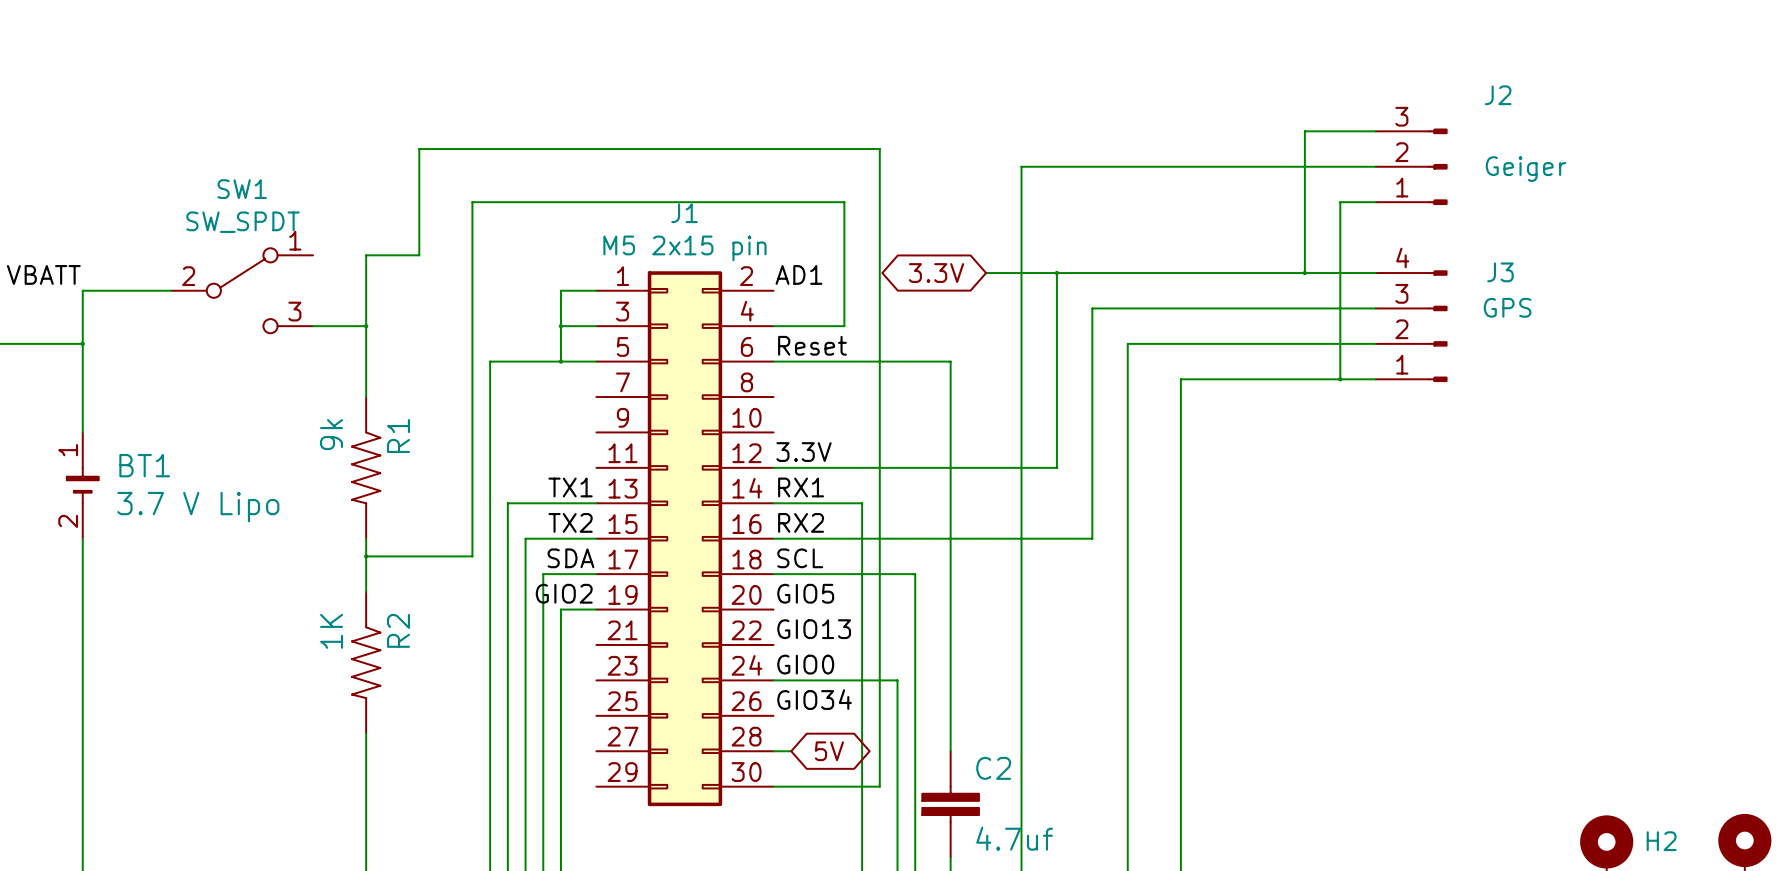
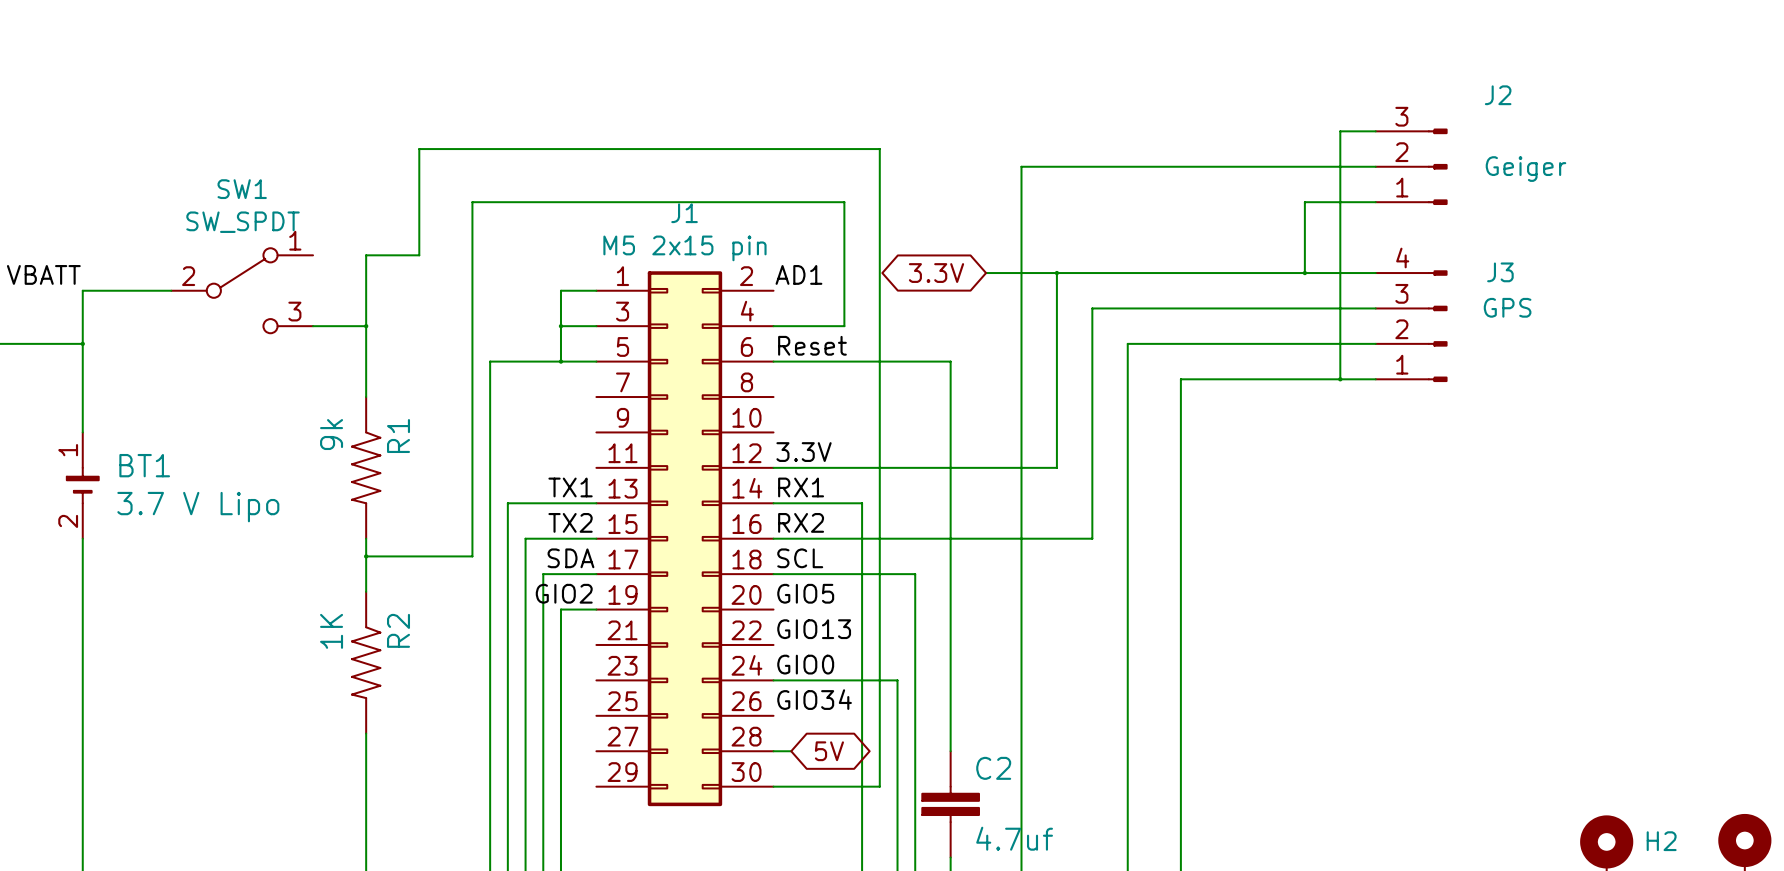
wire: (1340, 131) (1304, 131) (1304, 202) -> (1340, 131) (1340, 202) (1304, 202)

